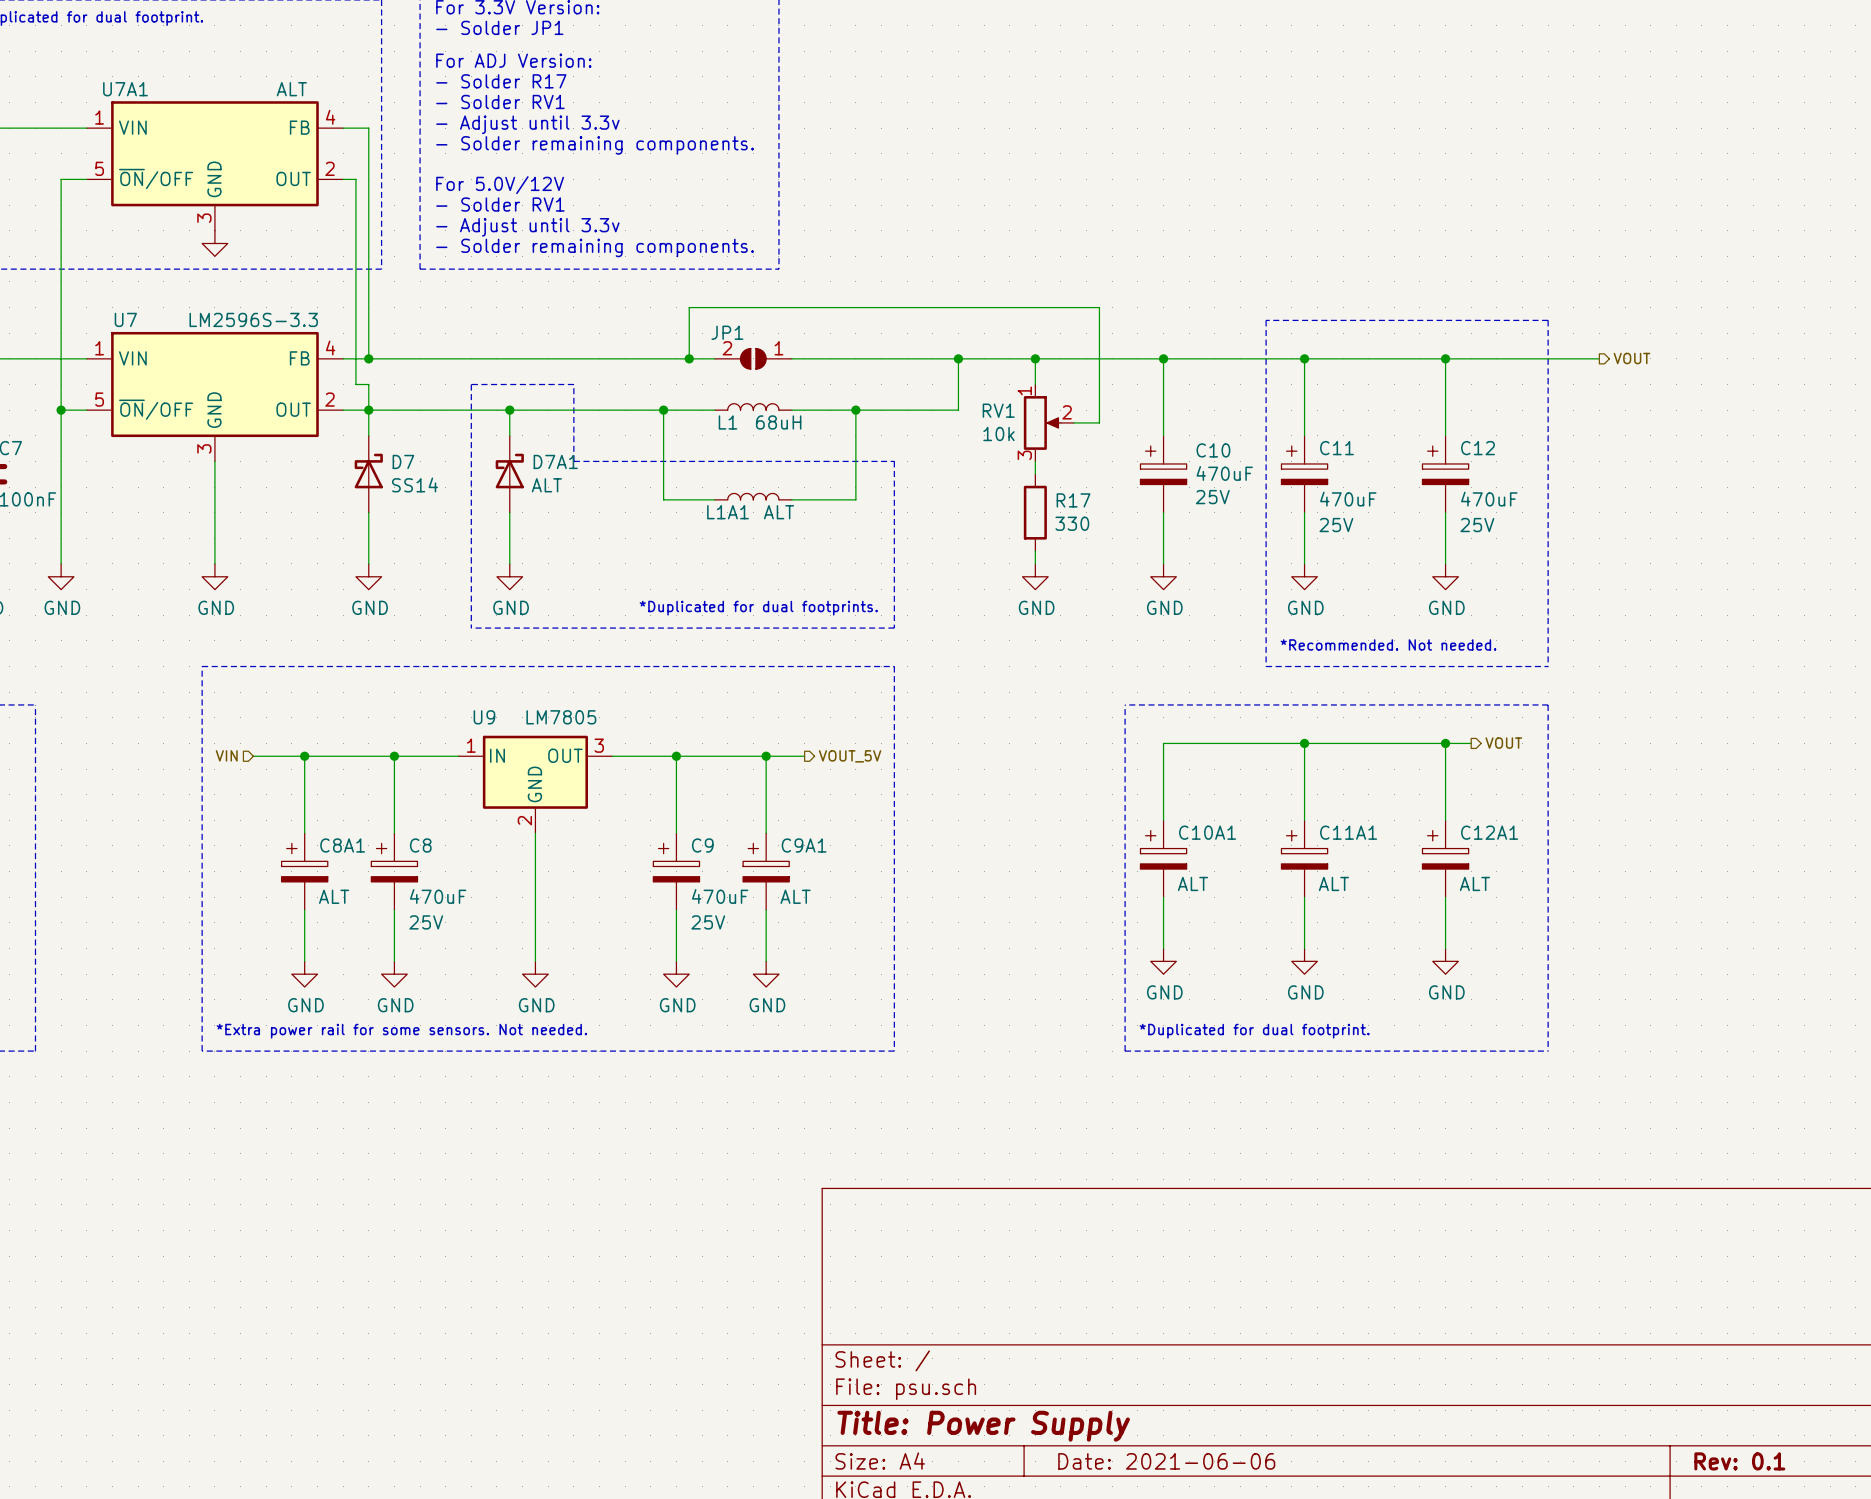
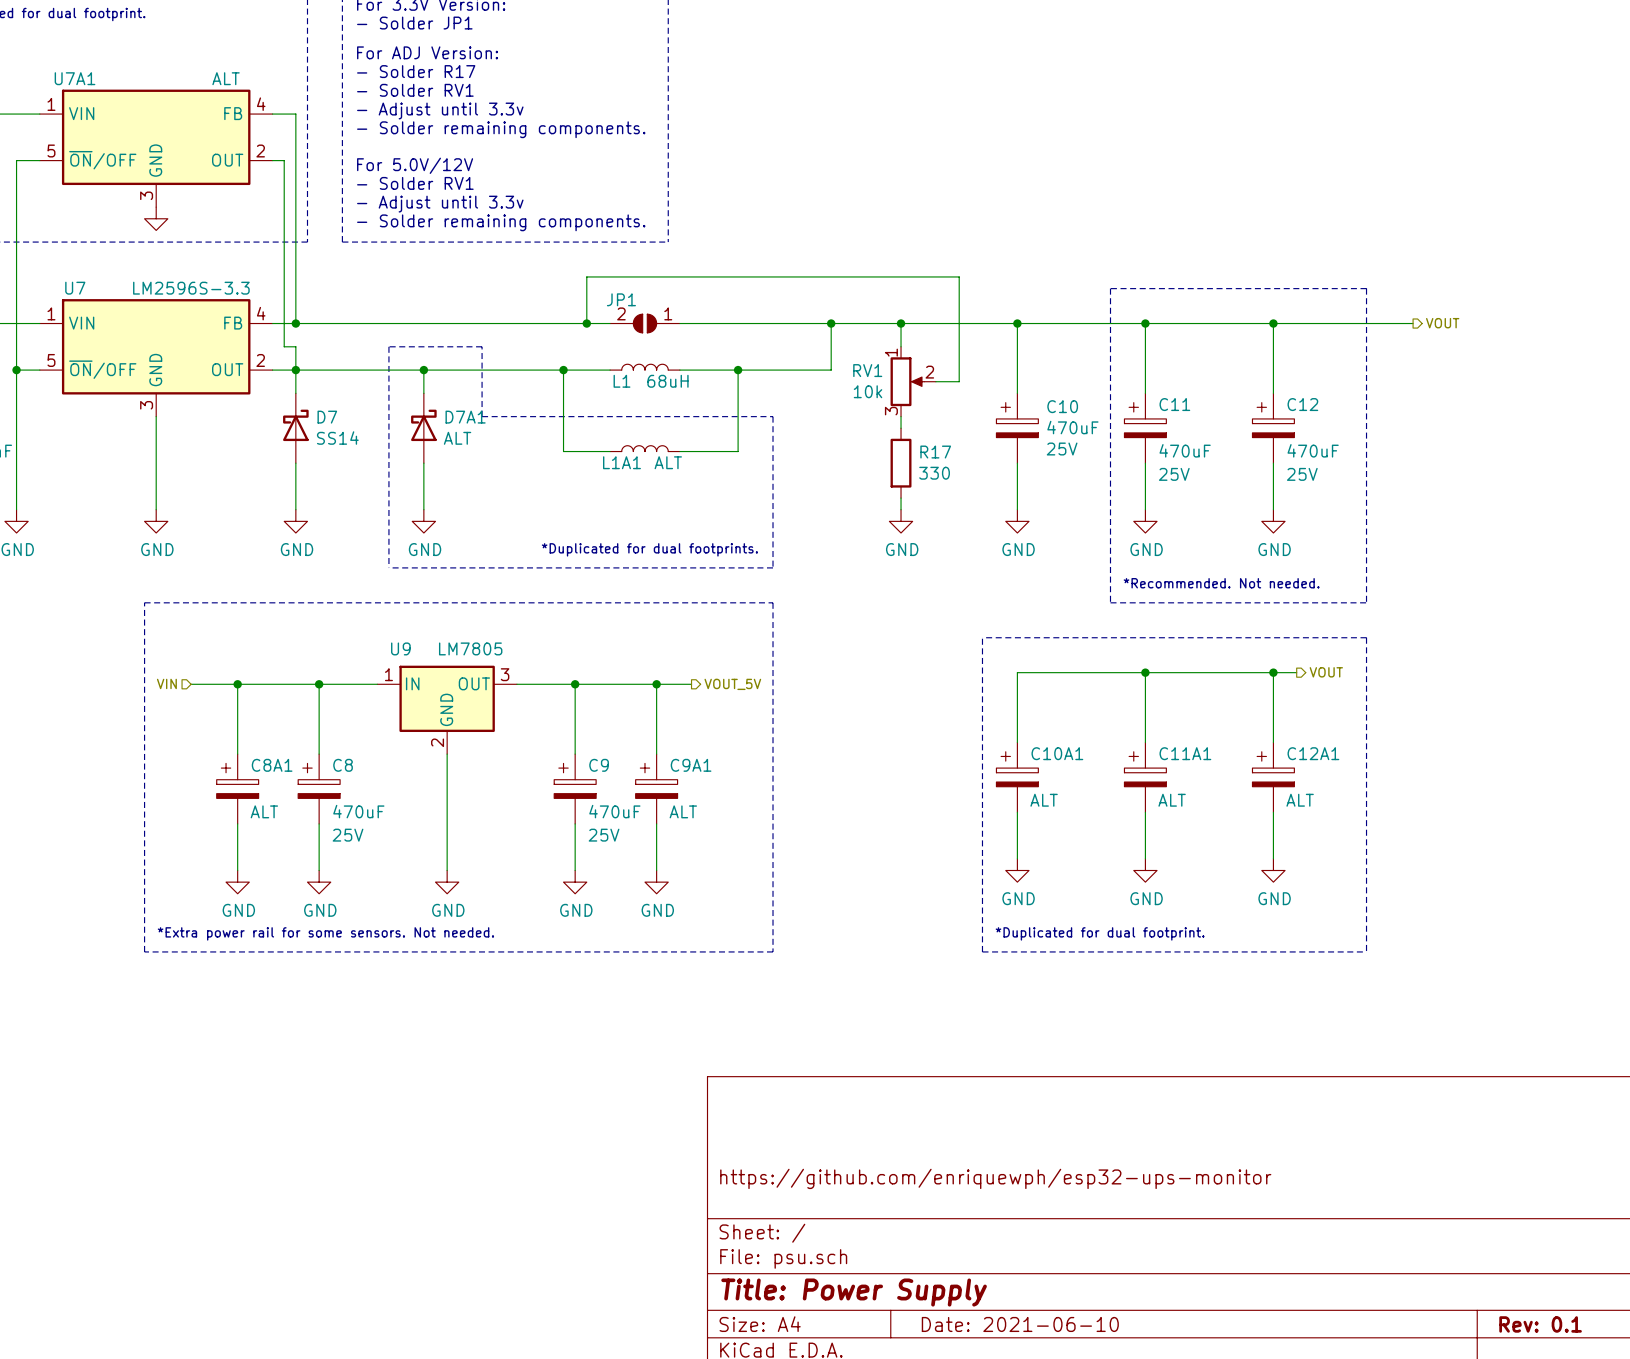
title block: none -> https://github.com/enriquewph/esp32-ups-monitor (995, 1178)
title block: Date: 2021-06-06 (1166, 1461) -> Date: 2021-06-10 (1020, 1324)

